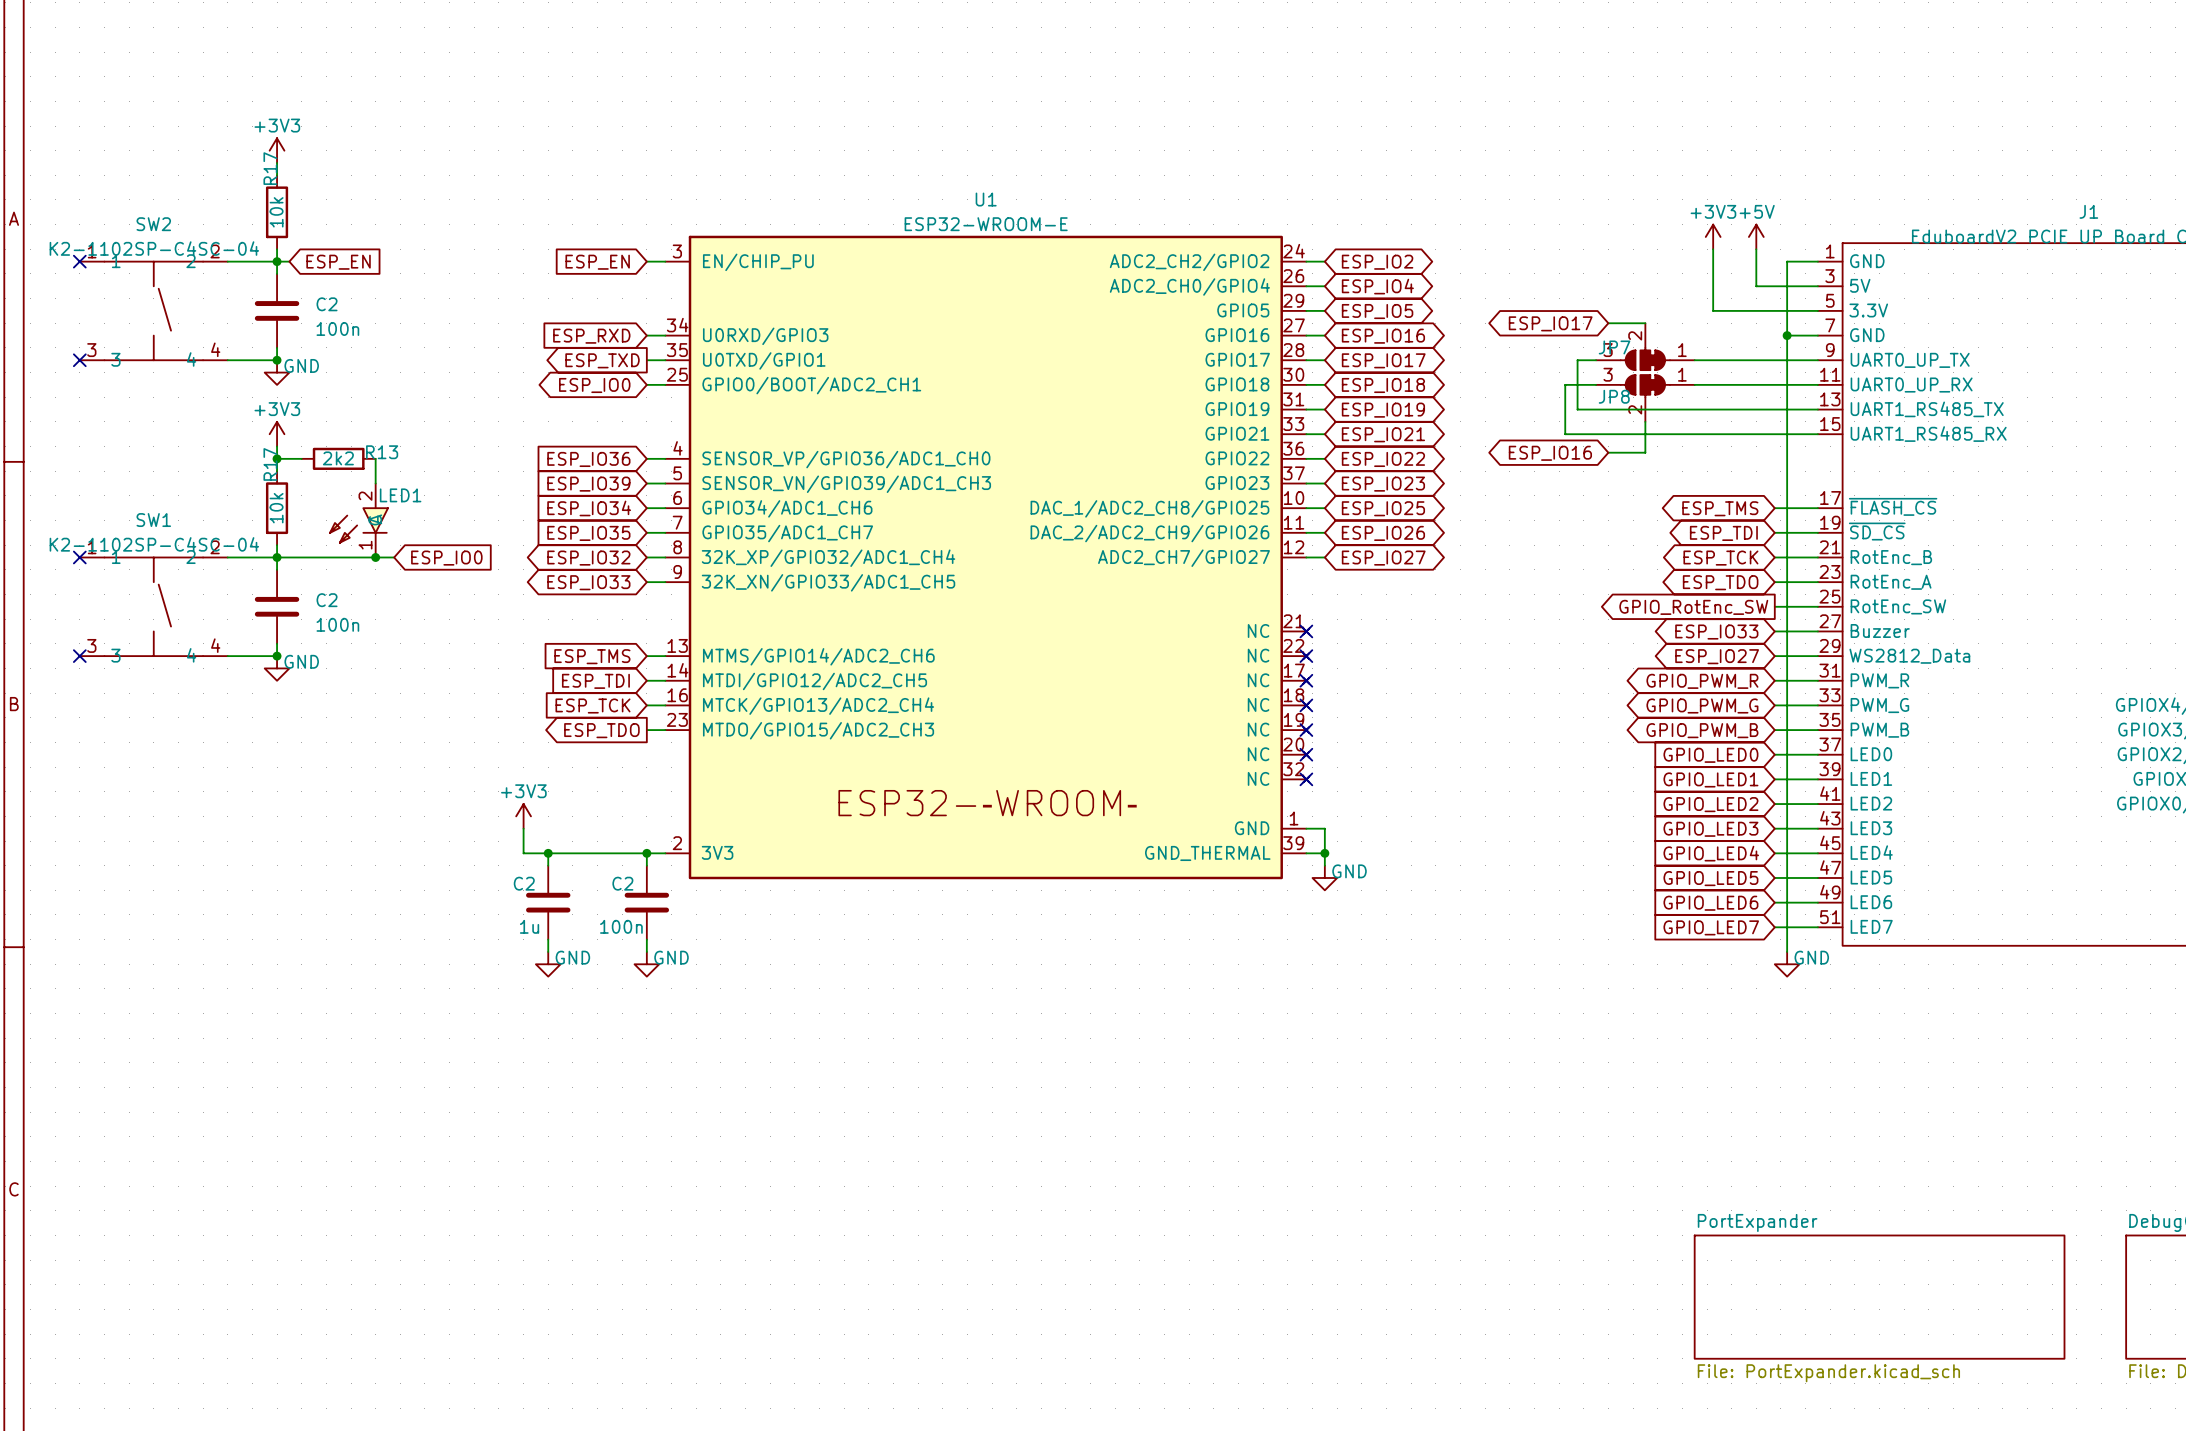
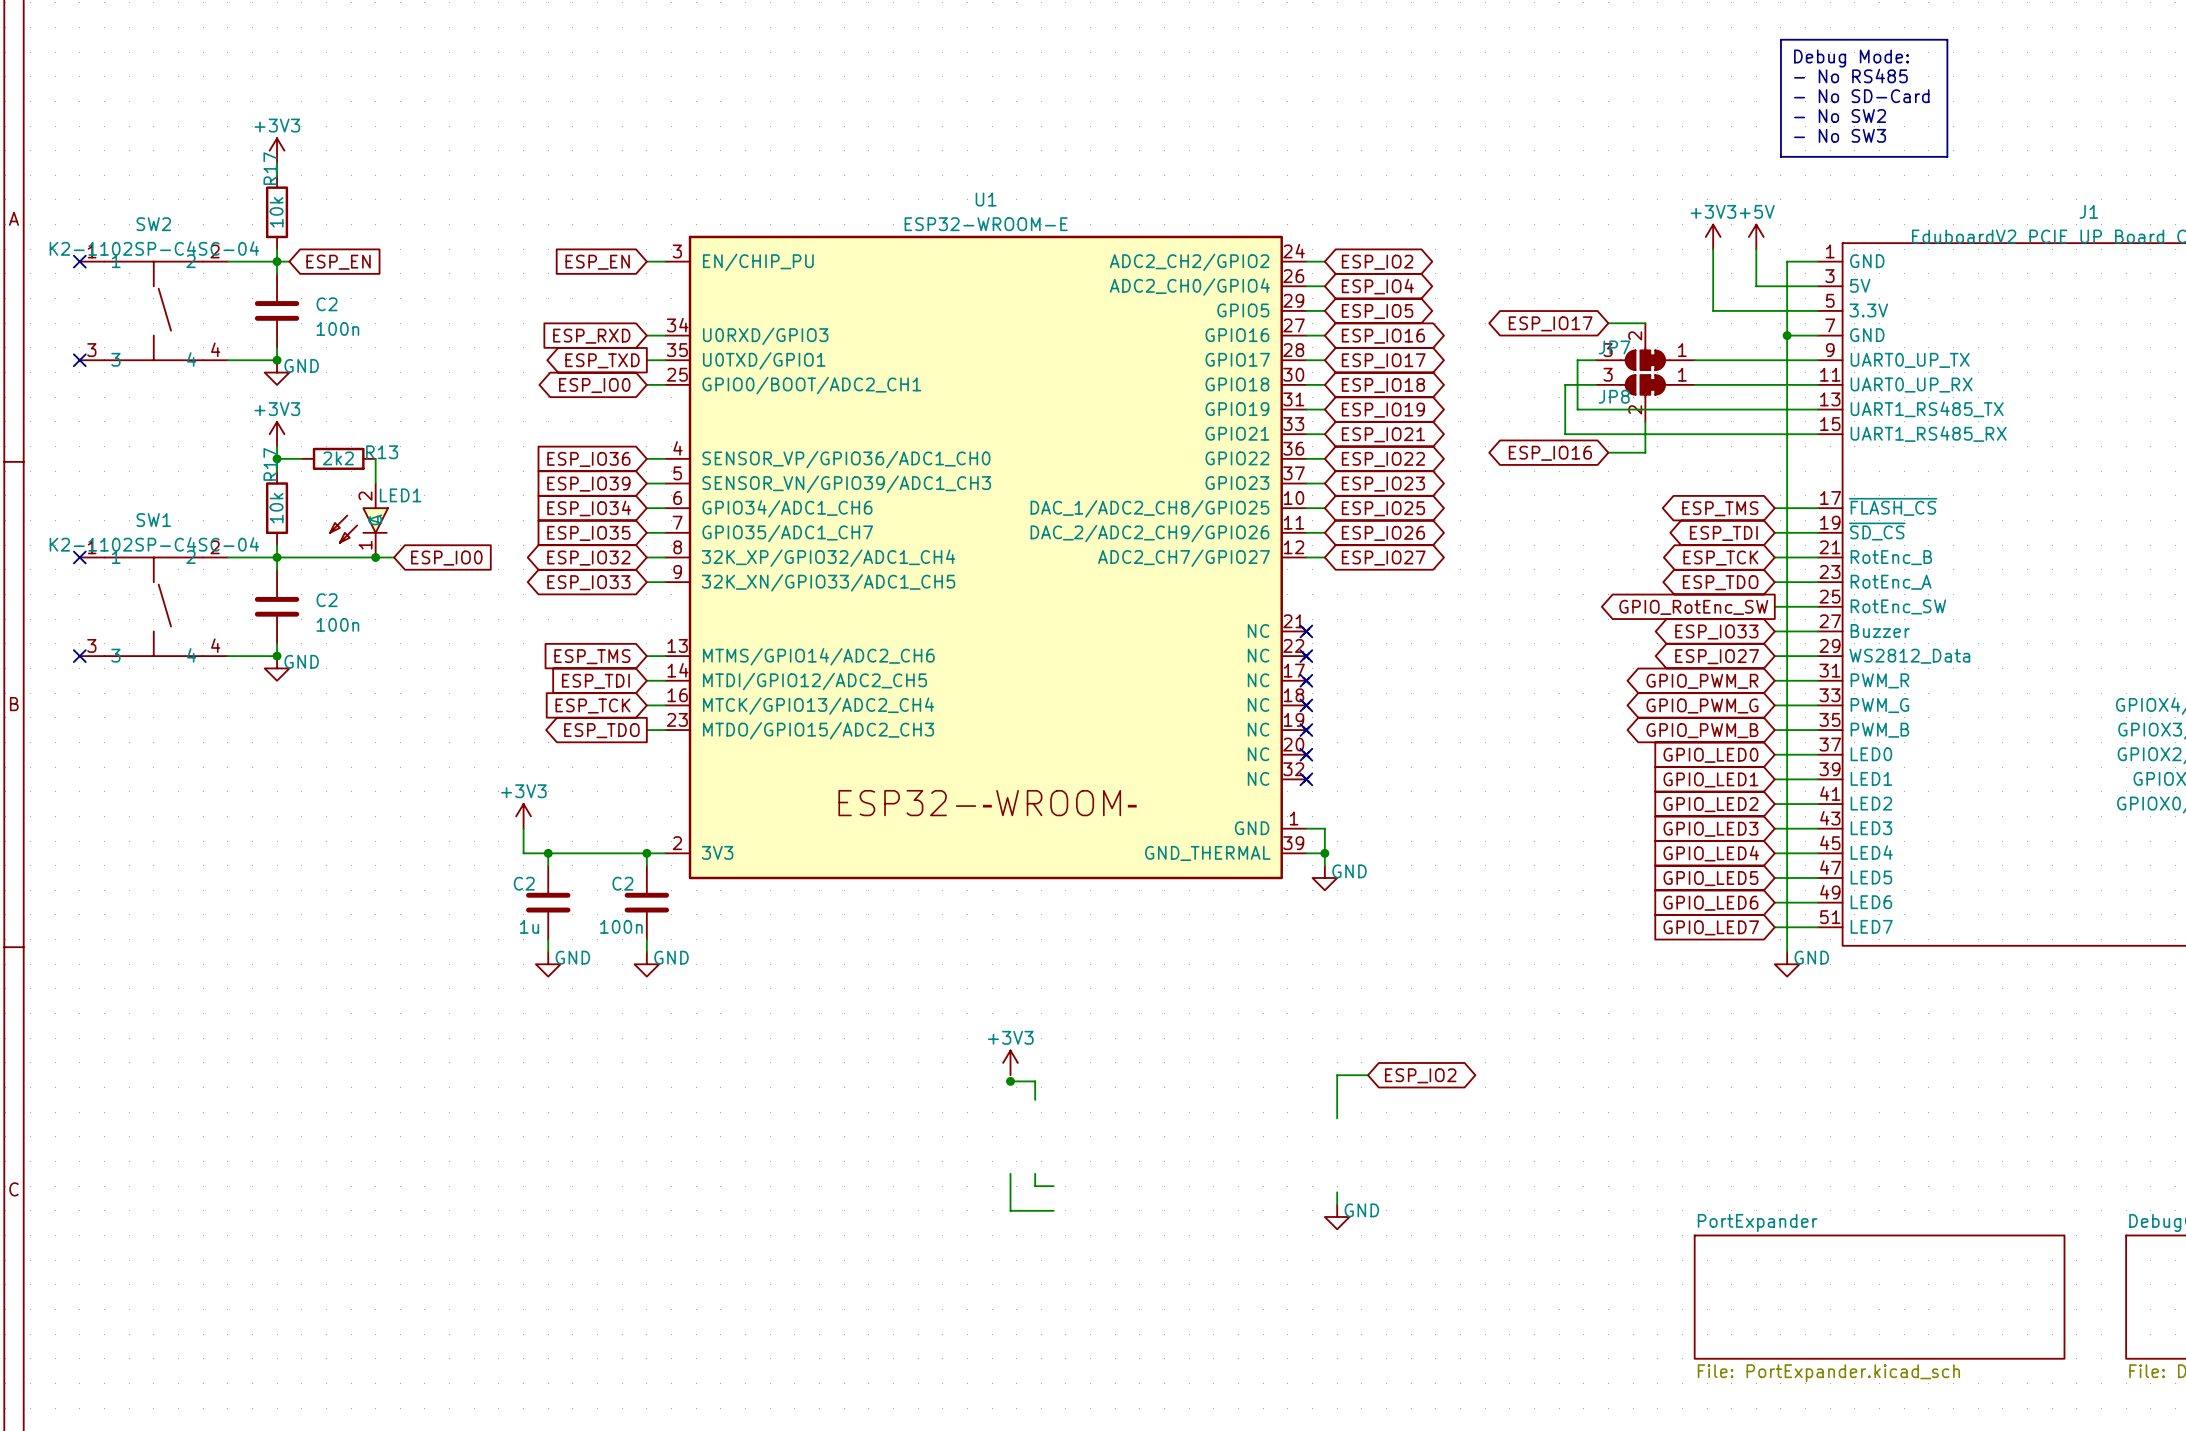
line: none -> (1780, 39) (1947, 39) (1947, 156) (1780, 156) (1780, 39)
text: none -> Debug Mode: (1851, 58)
text: none -> - No RS485 (1850, 76)
text: none -> - No SD-Card (1861, 96)
text: none -> - No SW2 (1840, 116)
text: none -> - No SW3 (1840, 135)
power symbol: none -> +3V3 (1010, 1062)
wire: none -> (1368, 1075) (1337, 1075) (1337, 1118)
global label: none -> ESP_IO2 (1420, 1075)
wire: none -> (1010, 1081) (1035, 1081) (1035, 1099)
junction: none -> (1010, 1081)
wire: none -> (1010, 1173) (1010, 1210) (1053, 1210)
wire: none -> (1035, 1173) (1035, 1186) (1053, 1186)
wire: none -> (1337, 1192) (1337, 1204)
power symbol: none -> GND (1337, 1216)

